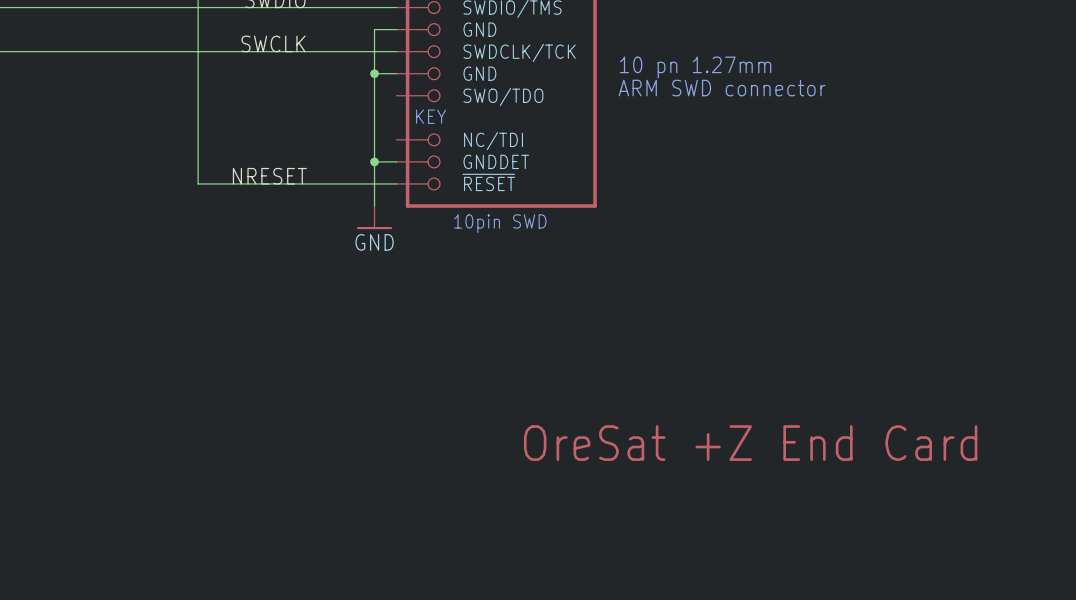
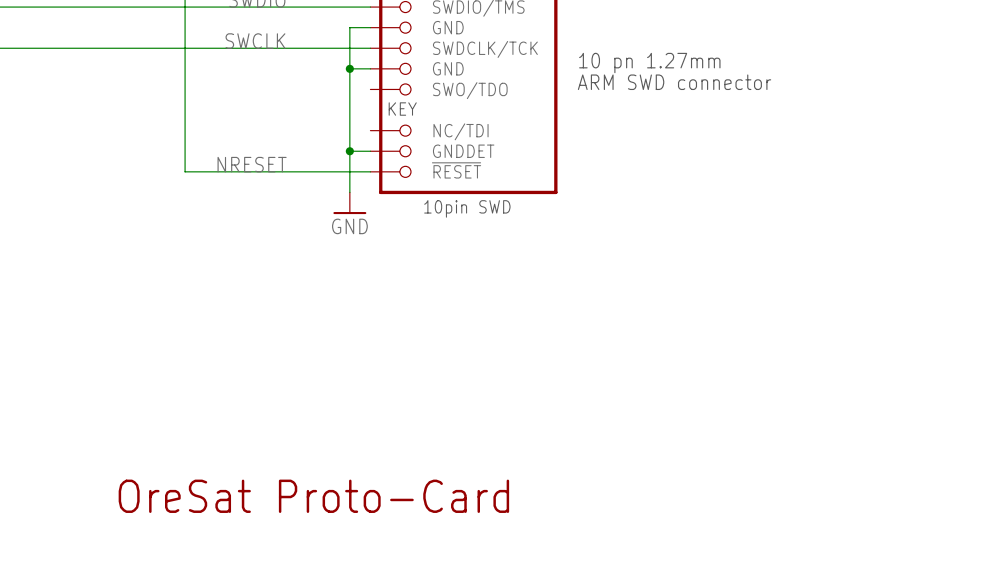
text: OreSat +Z End Card (750, 443) -> none
text: none -> OreSat Proto-Card (313, 496)

